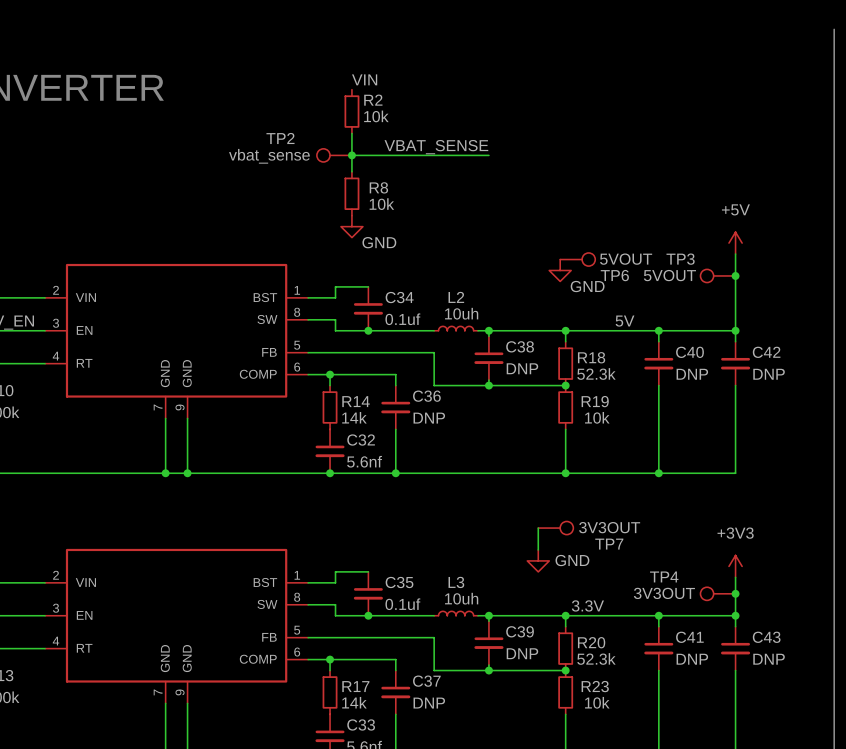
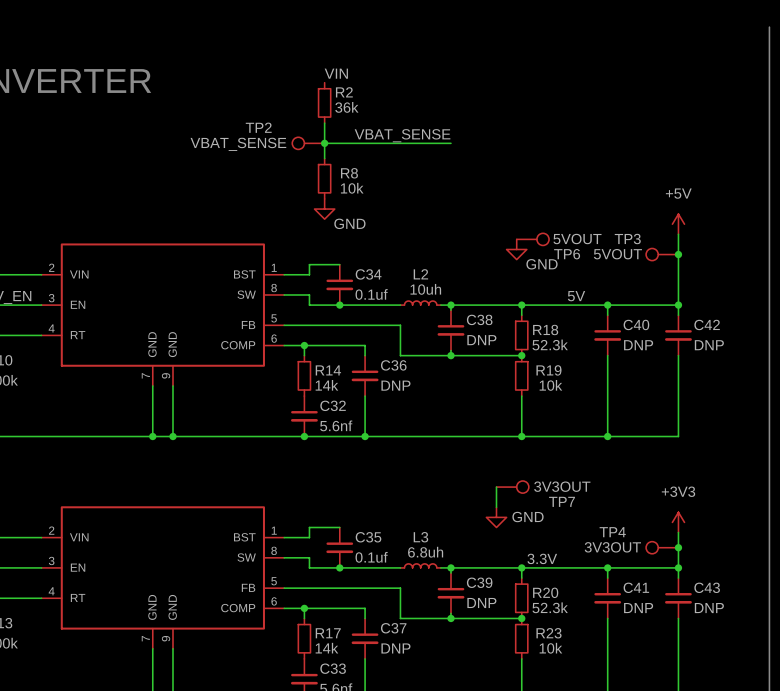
R2 value: 10k (376, 116) -> 36k (346, 107)
TP2 value: vbat_sense (269, 156) -> VBAT_SENSE (238, 144)
L3 value: 10uh (461, 598) -> 6.8uh (425, 552)

